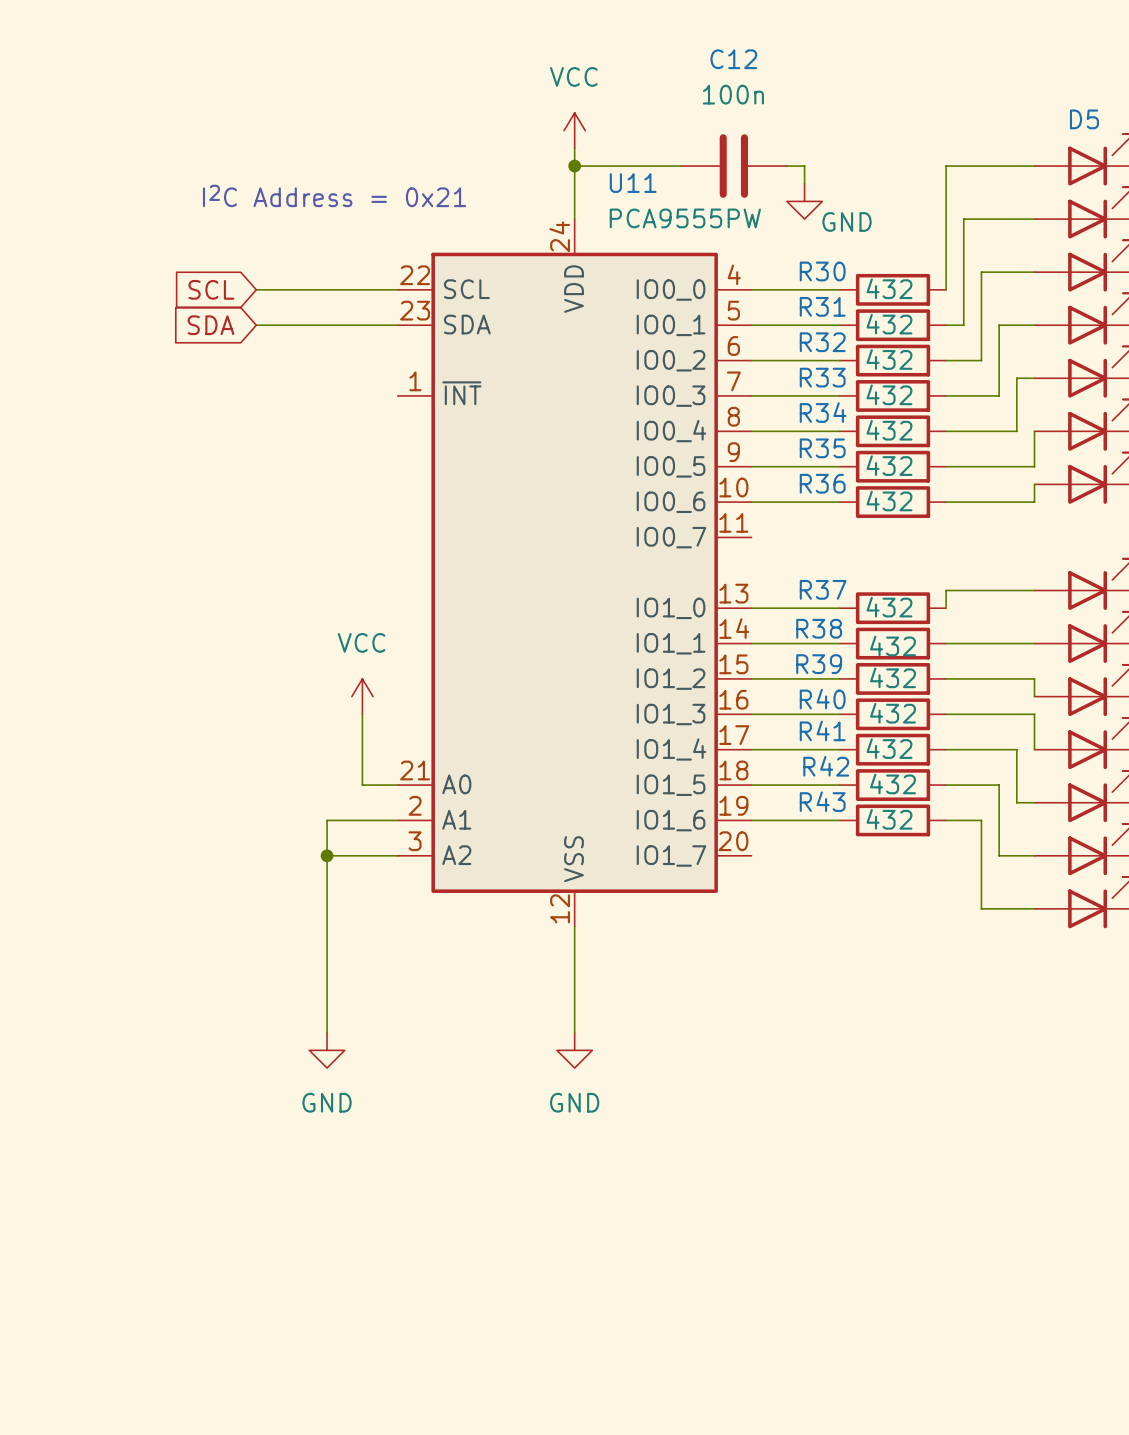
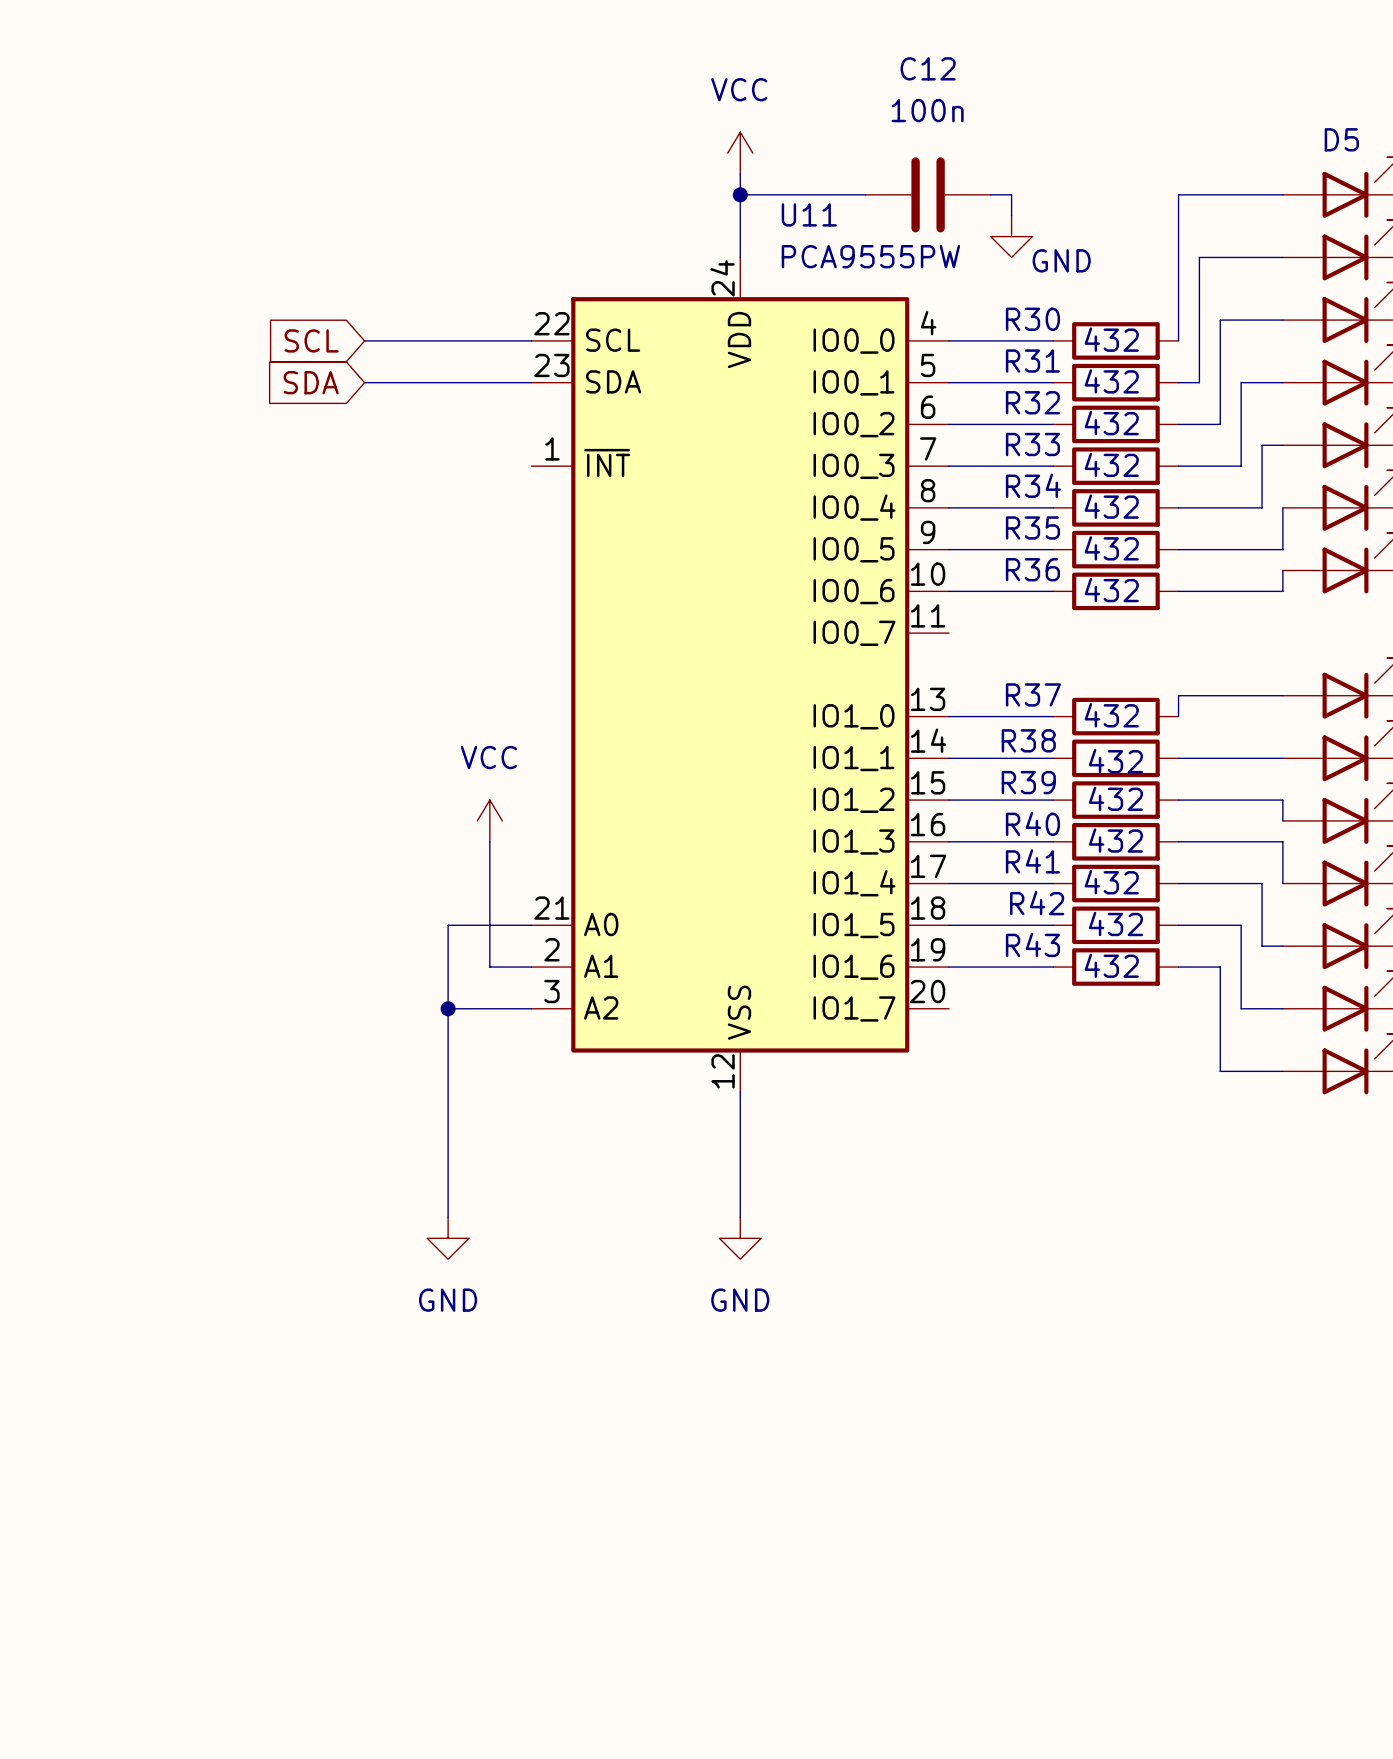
text: I2C Address = 0x21 (334, 195) -> none
wire: (327, 820) (362, 820) -> (448, 967) (448, 925) (489, 925) (489, 967)

